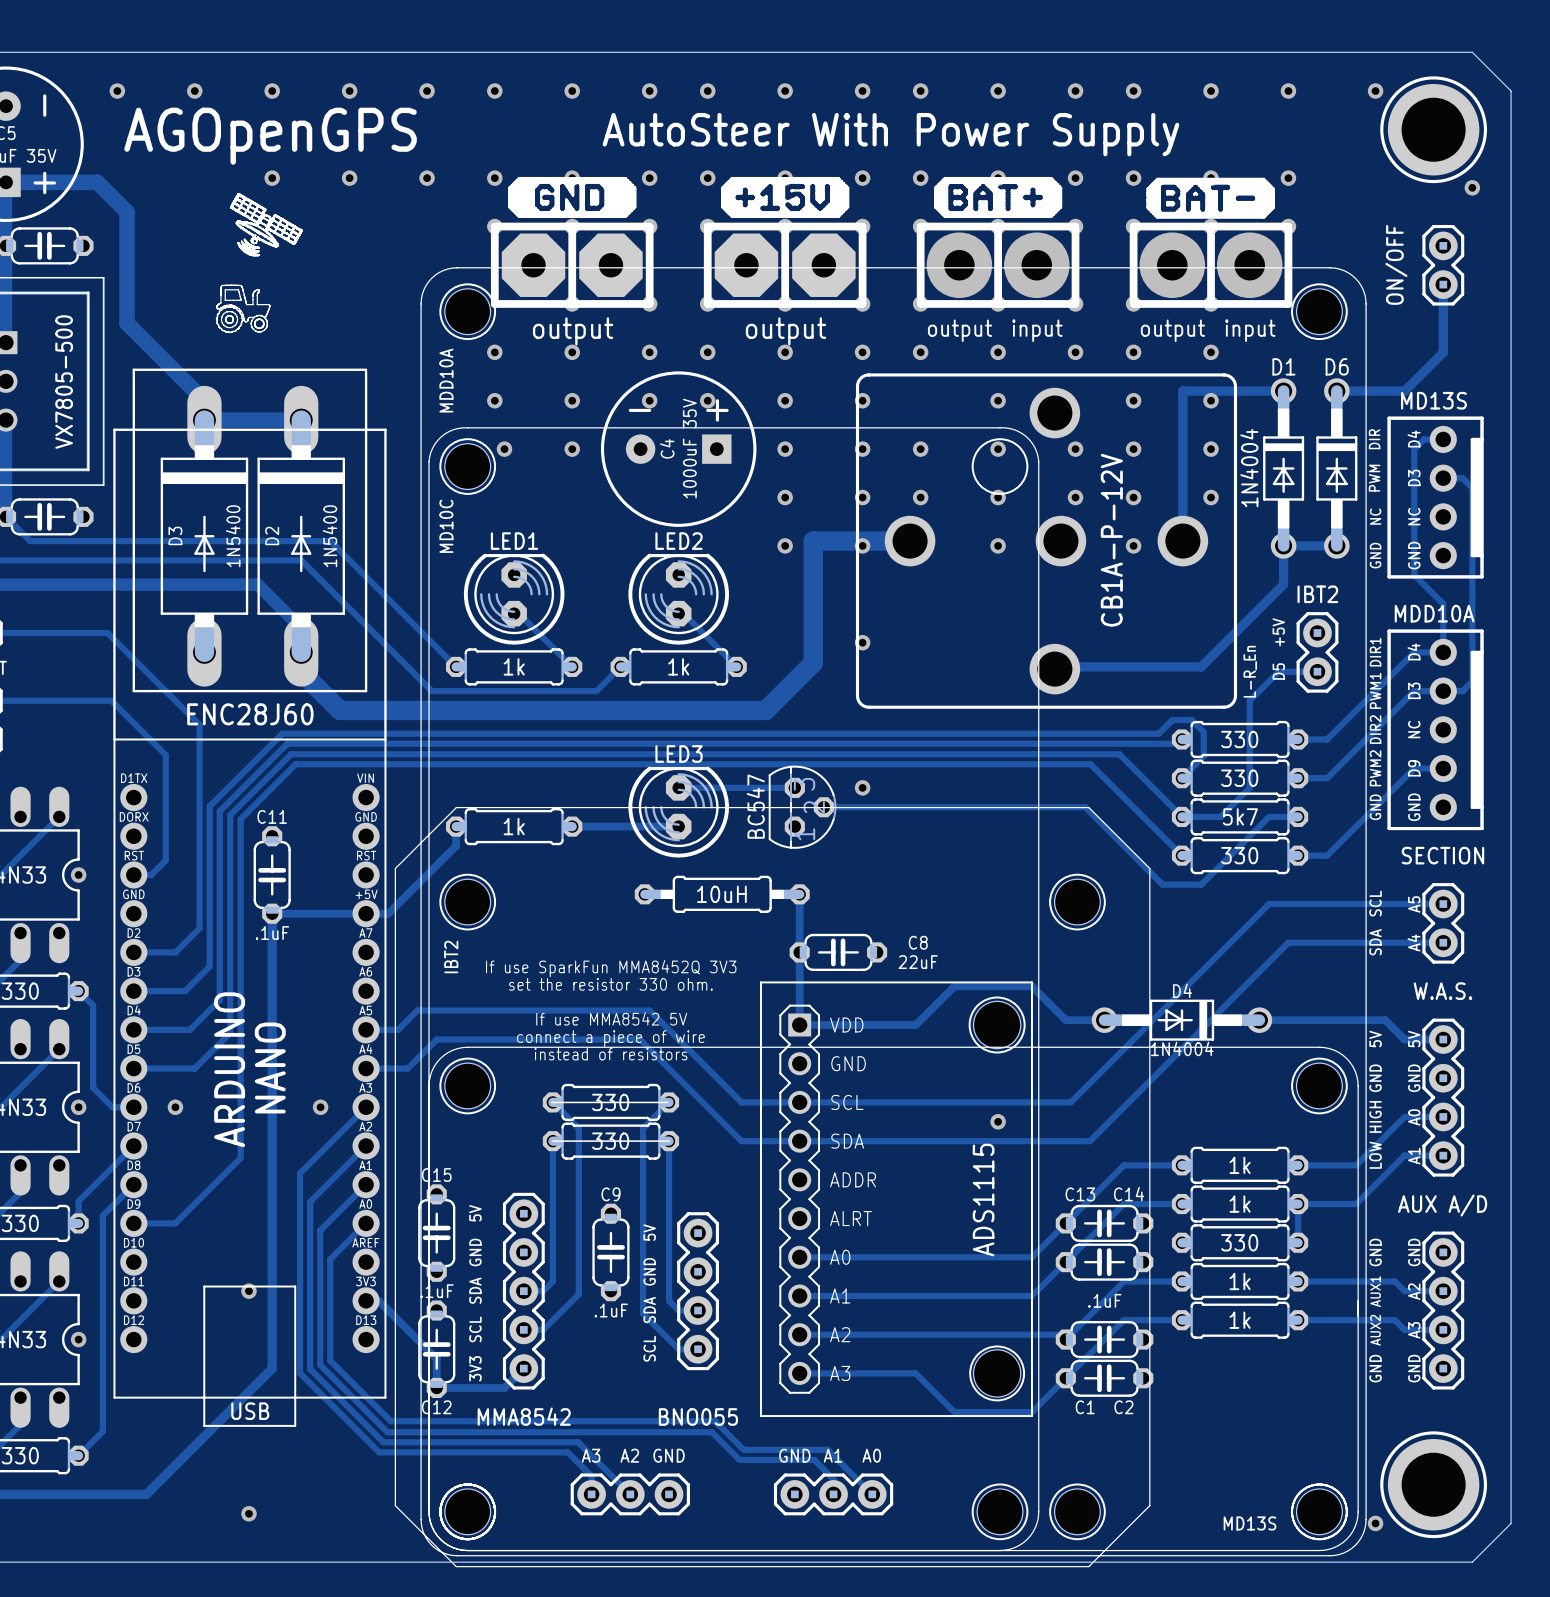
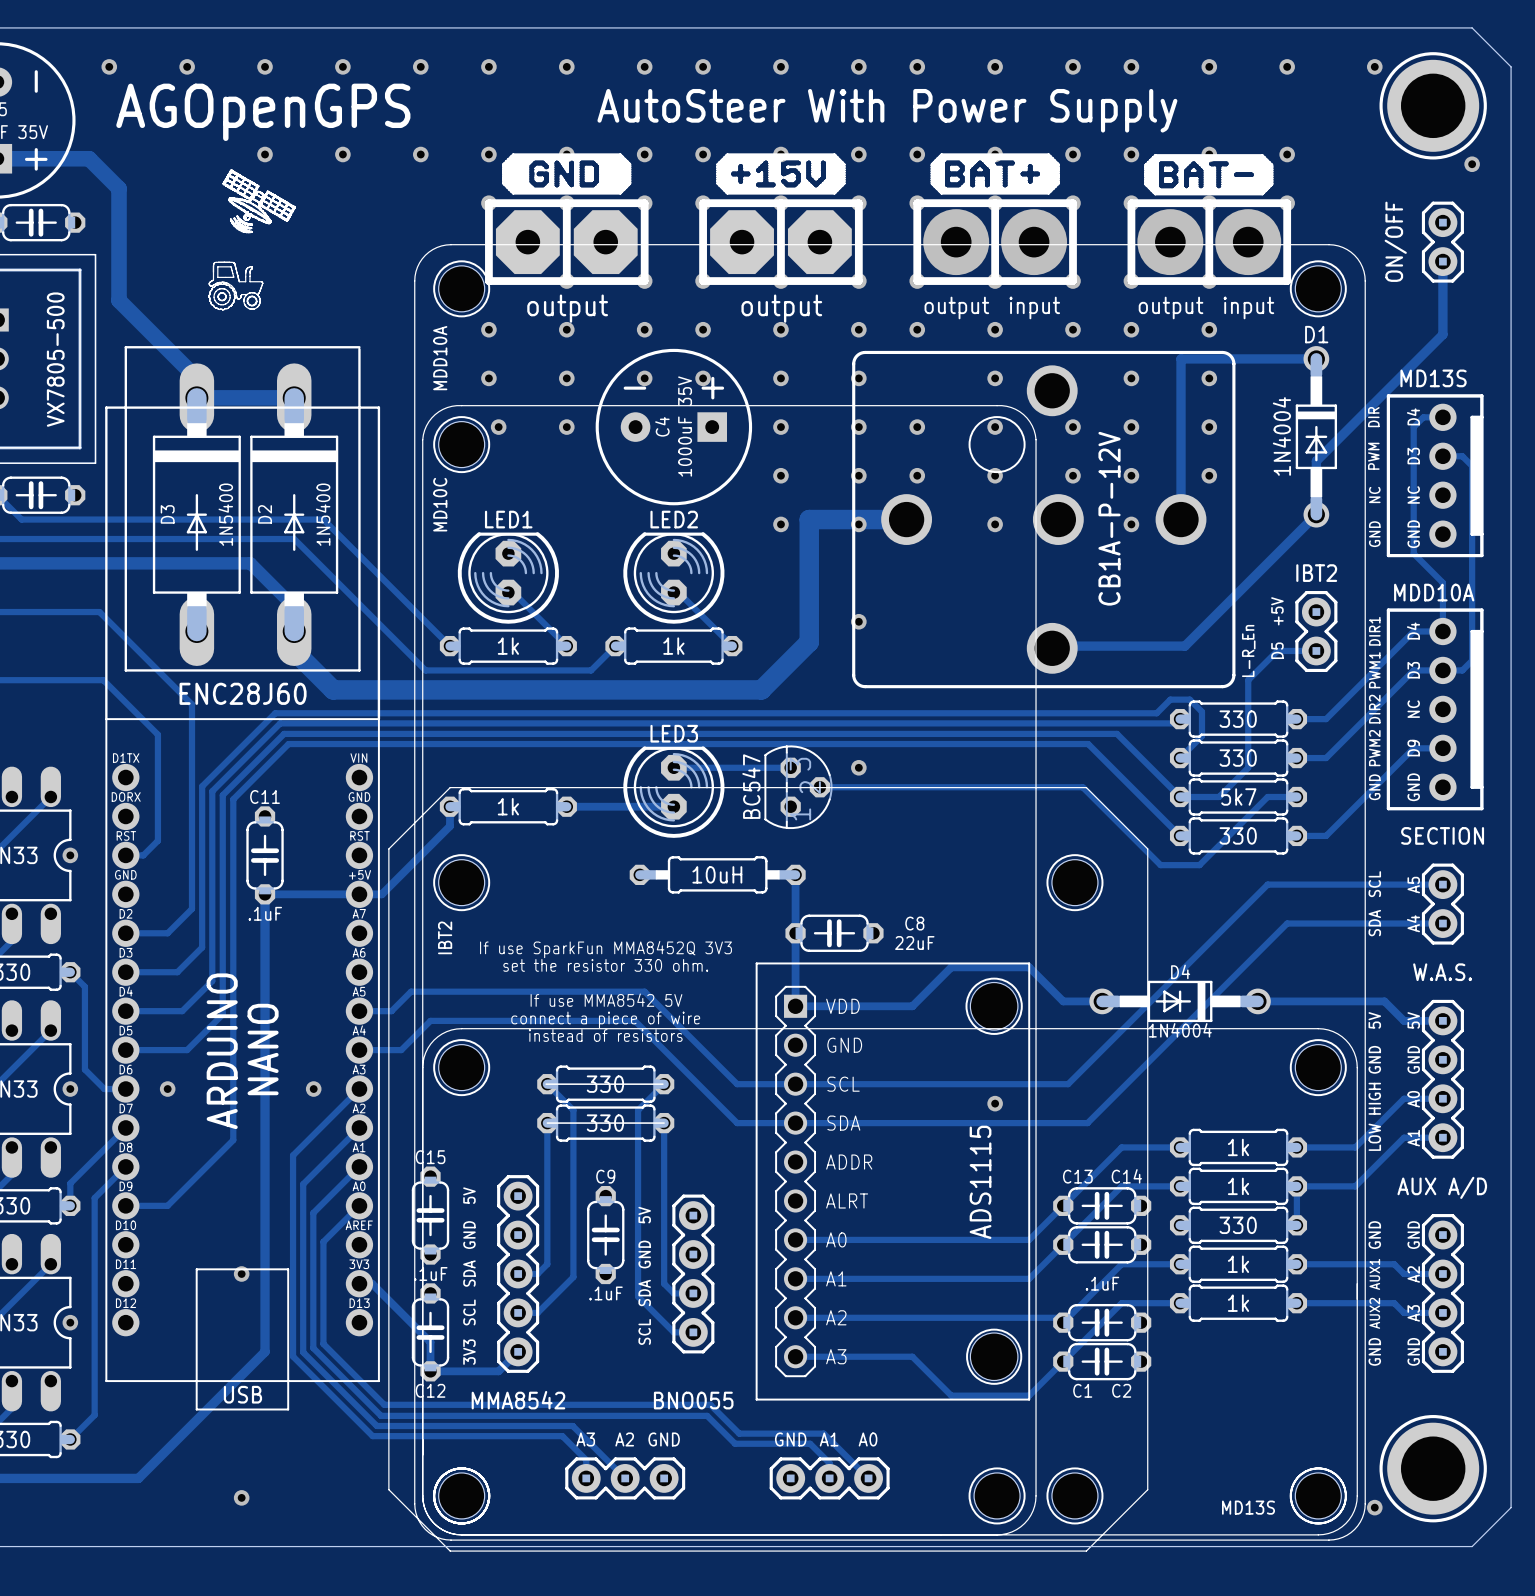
track: (1443, 352) (1404, 391) (1336, 391) -> none
track: (1182, 391) (1283, 391) -> (1181, 368) (1181, 358) (1316, 358)
D1 position: (1283, 468) -> (1316, 436)
D6: (1336, 468) -> none
track: (1336, 545) (1283, 545) (1283, 584) (1201, 666) (1186, 666) -> (1442, 329) (1442, 334) (1316, 461) (1316, 514) (1184, 646)

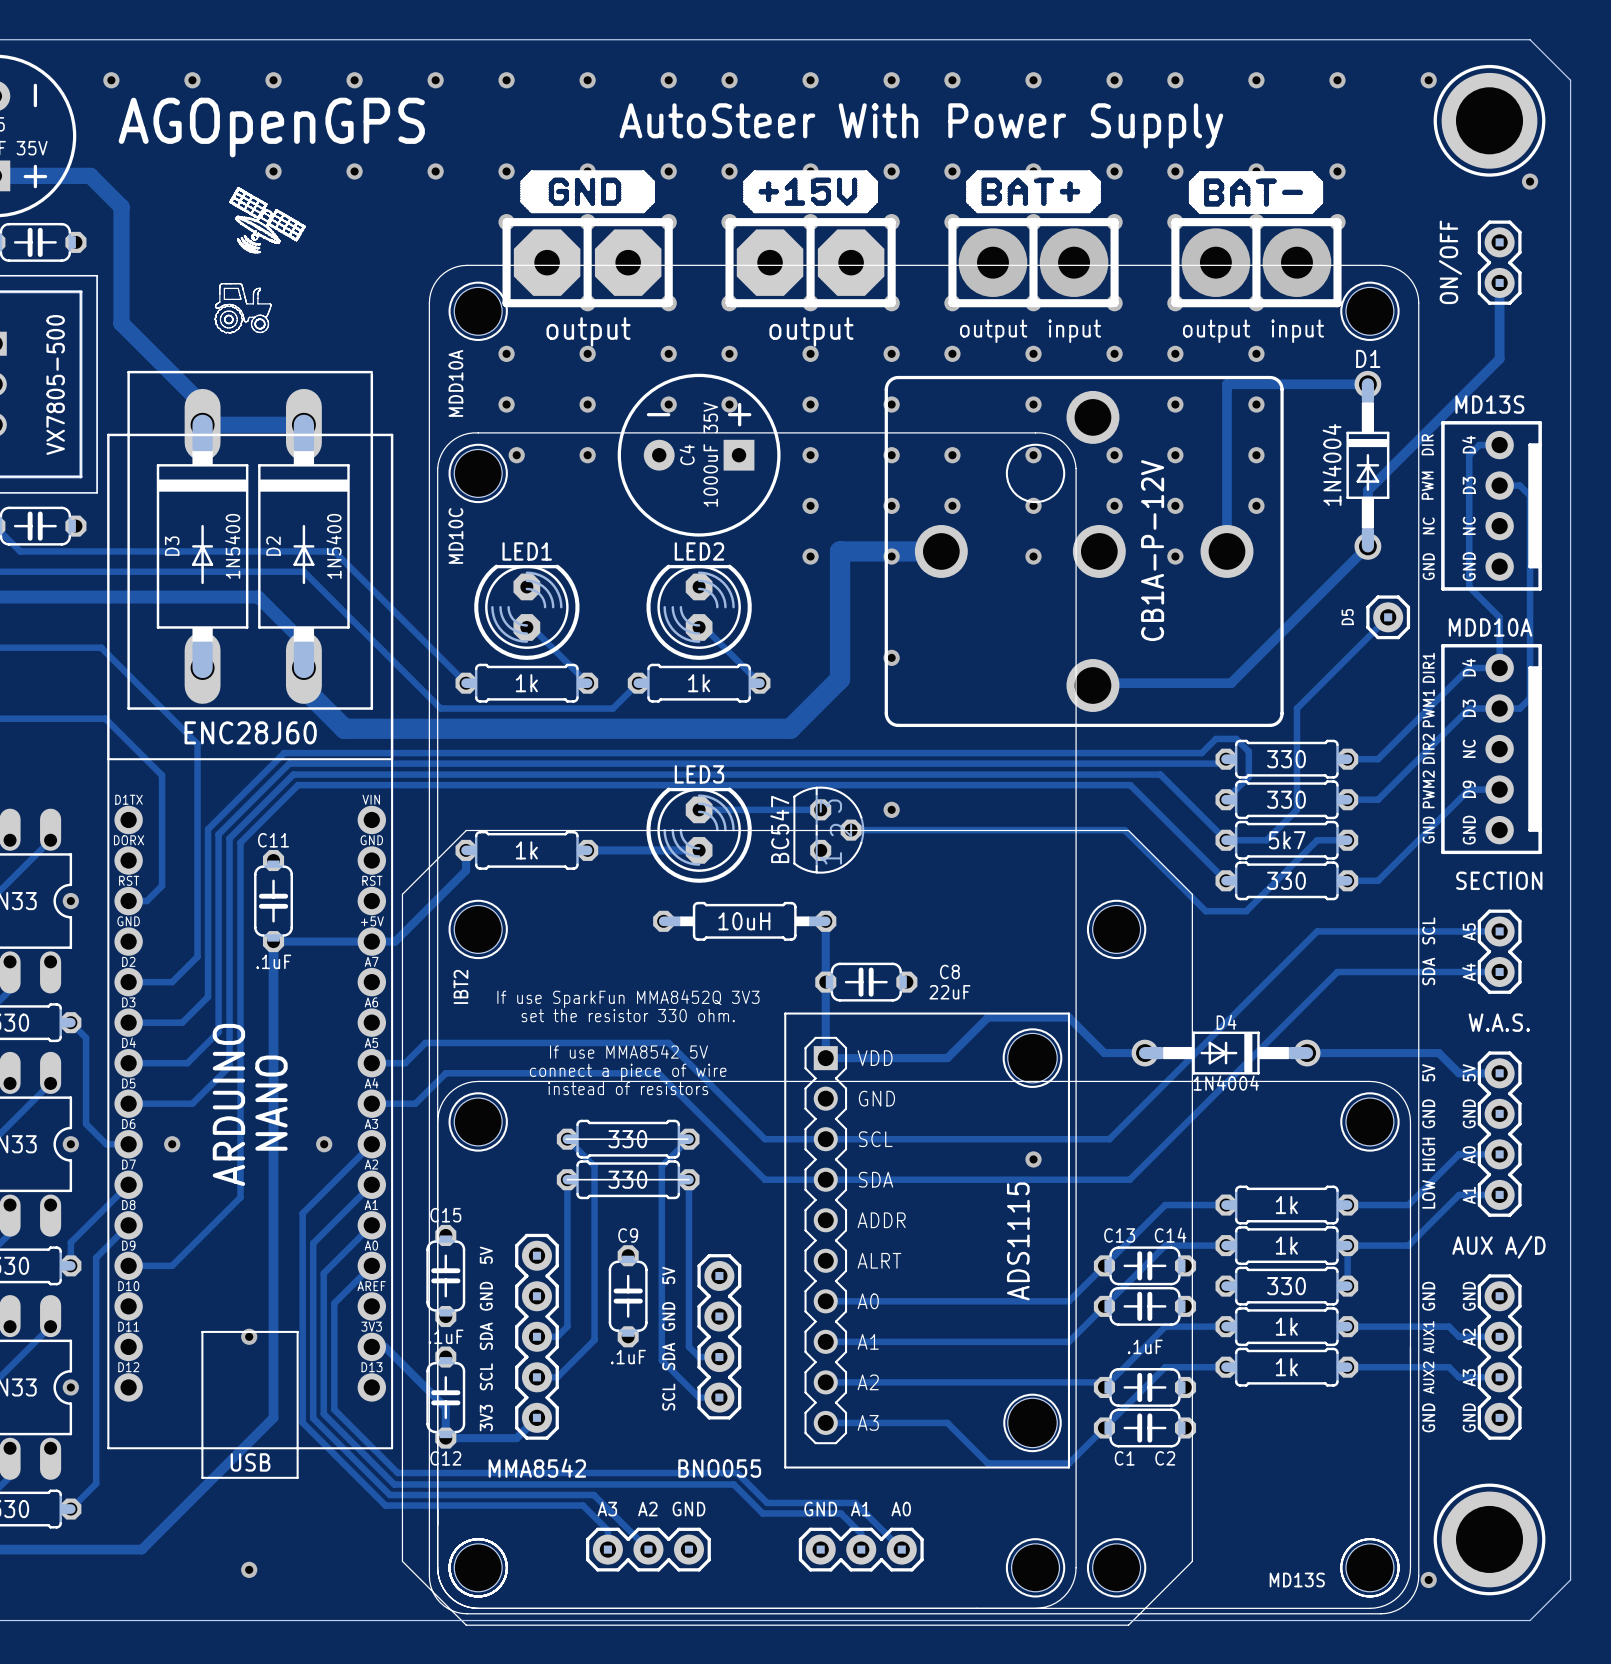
text: IBT2 (1316, 573) -> none
D5 footprint: [1295, 591, 1338, 673] -> [1366, 595, 1411, 640]
text: +5V (1277, 611) -> none
text: L-R_En (1248, 650) -> none
track: (1316, 650) (1277, 650) (1248, 680) -> (1388, 617) (1296, 708) (1296, 718)

